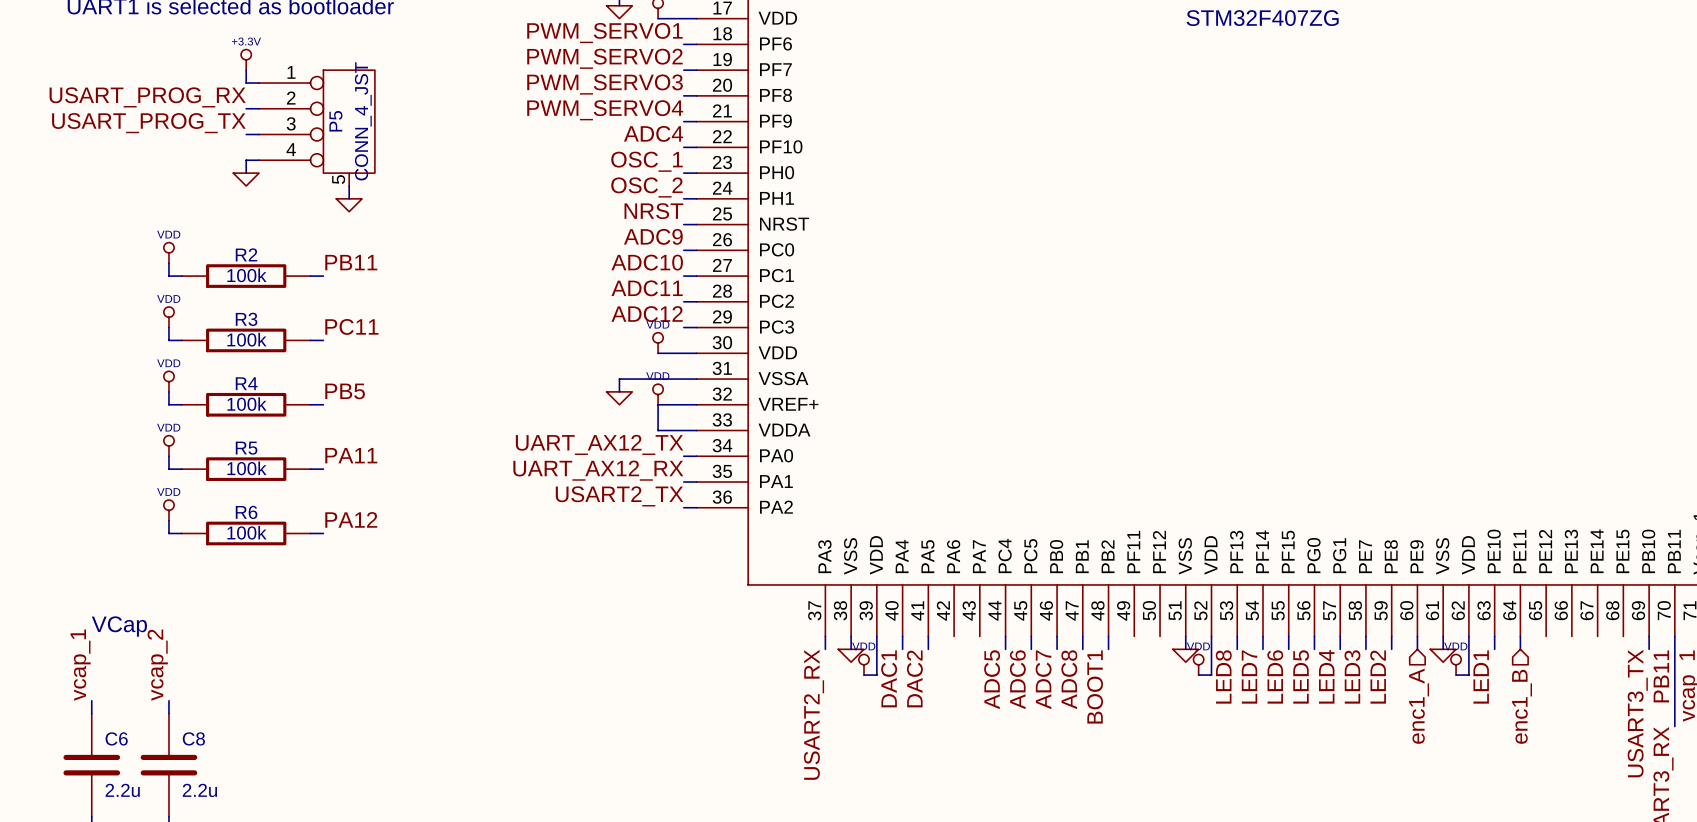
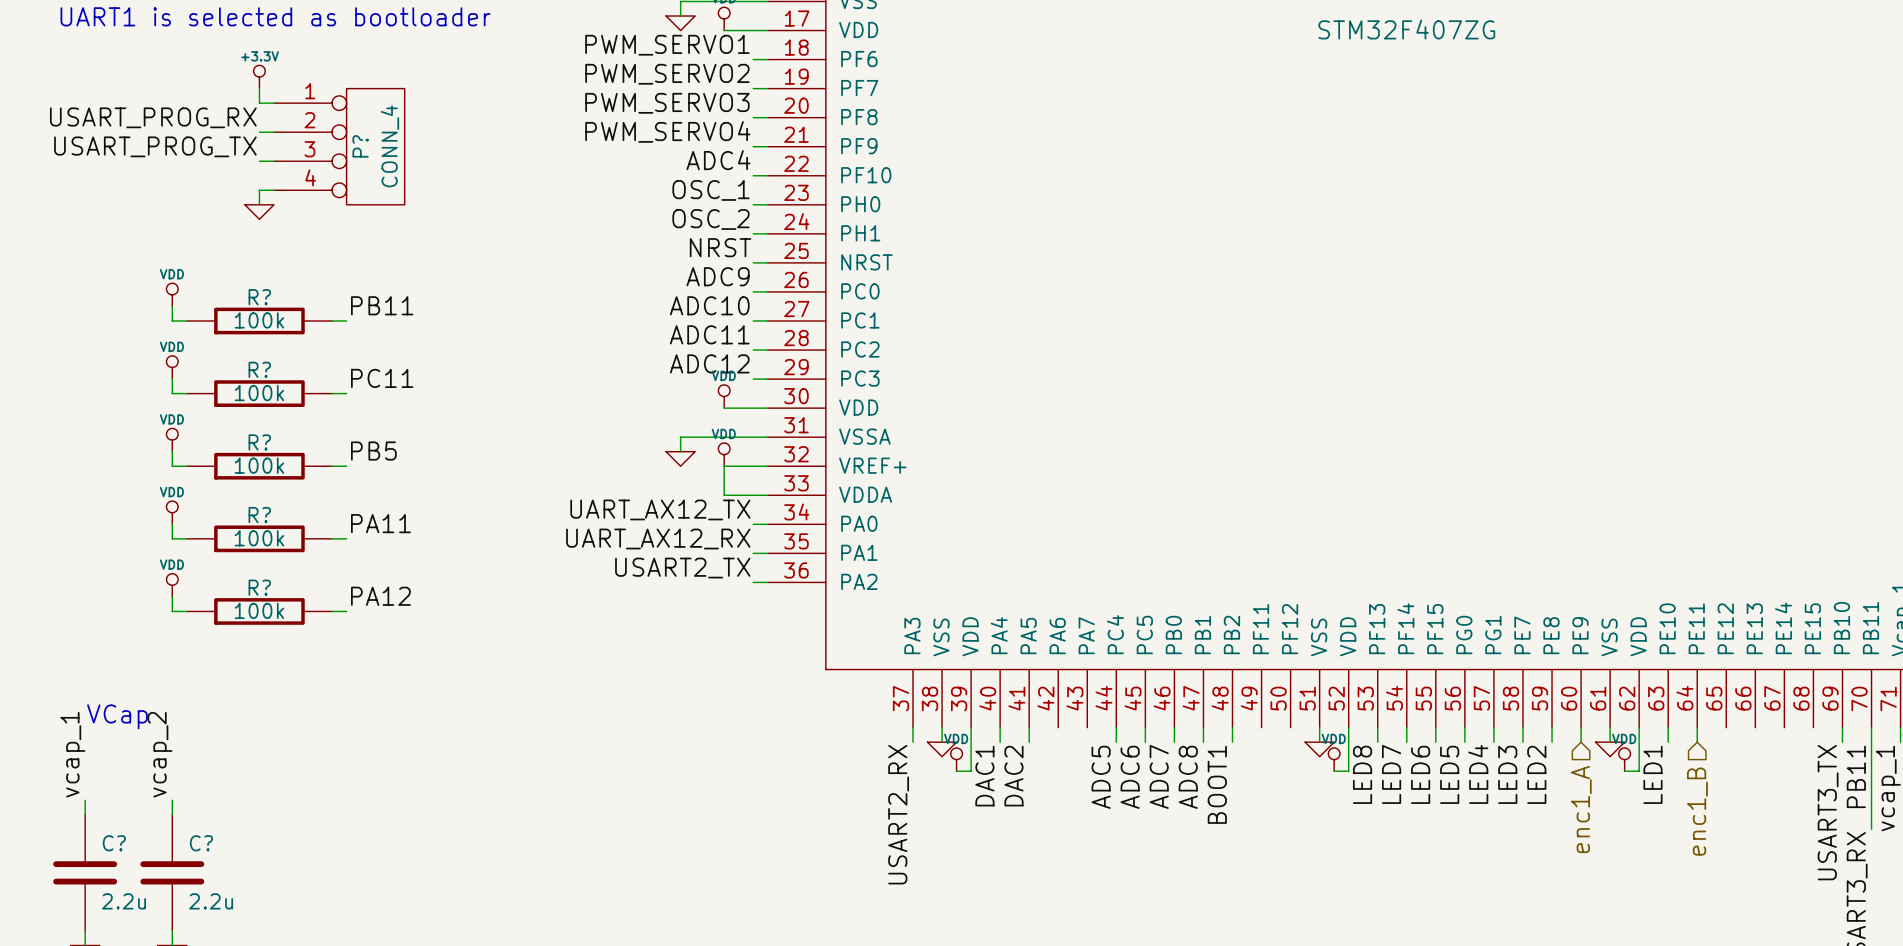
P?: none -> CONN_4 (339, 146)
P5: CONN_4_JST (316, 128) -> none
wire: (349, 185) (349, 198) -> none
power symbol: (349, 205) -> none
R2 name: R2 (246, 254) -> R? (259, 297)
R3 name: R3 (246, 319) -> R? (259, 369)
R4 name: R4 (246, 383) -> R? (259, 442)
R5 name: R5 (246, 448) -> R? (259, 515)
R6 name: R6 (246, 512) -> R? (259, 587)
C6 name: C6 (116, 738) -> C? (114, 843)
C8 name: C8 (193, 738) -> C? (201, 843)

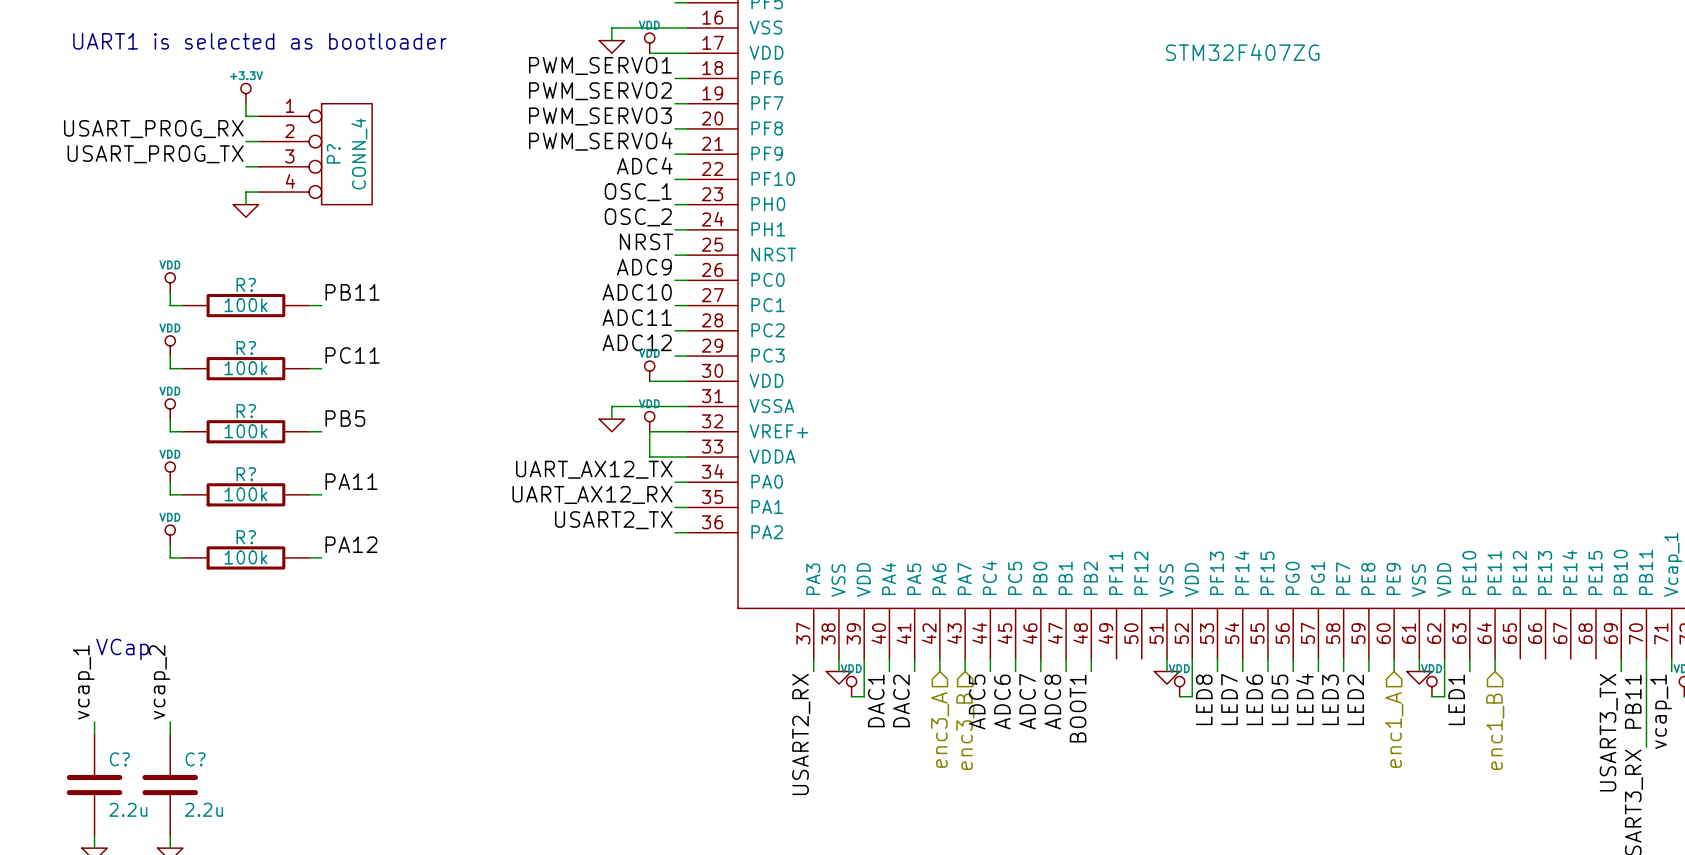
wire: none -> (939, 658) (939, 671)
wire: none -> (965, 658) (965, 671)
hierarchical label: none -> enc3_A (940, 729)
hierarchical label: none -> enc3_B (965, 731)

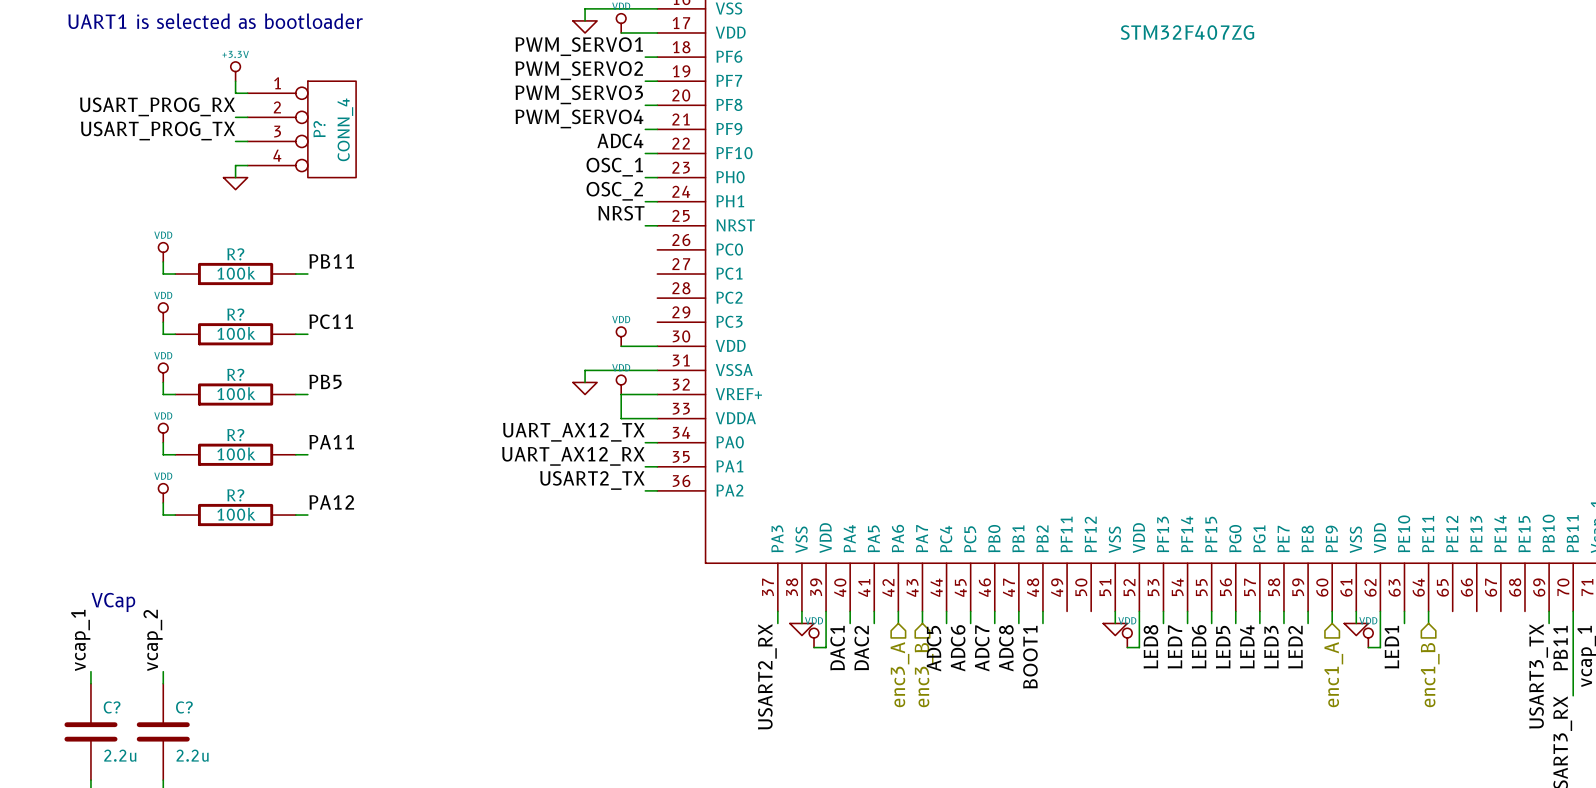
label: ADC9 (644, 267) -> none
wire: (674, 280) (687, 280) -> none
label: ADC10 (637, 292) -> none
wire: (674, 305) (687, 305) -> none
label: ADC11 (637, 317) -> none
wire: (674, 330) (687, 330) -> none
label: ADC12 (637, 342) -> none
wire: (674, 356) (687, 356) -> none

